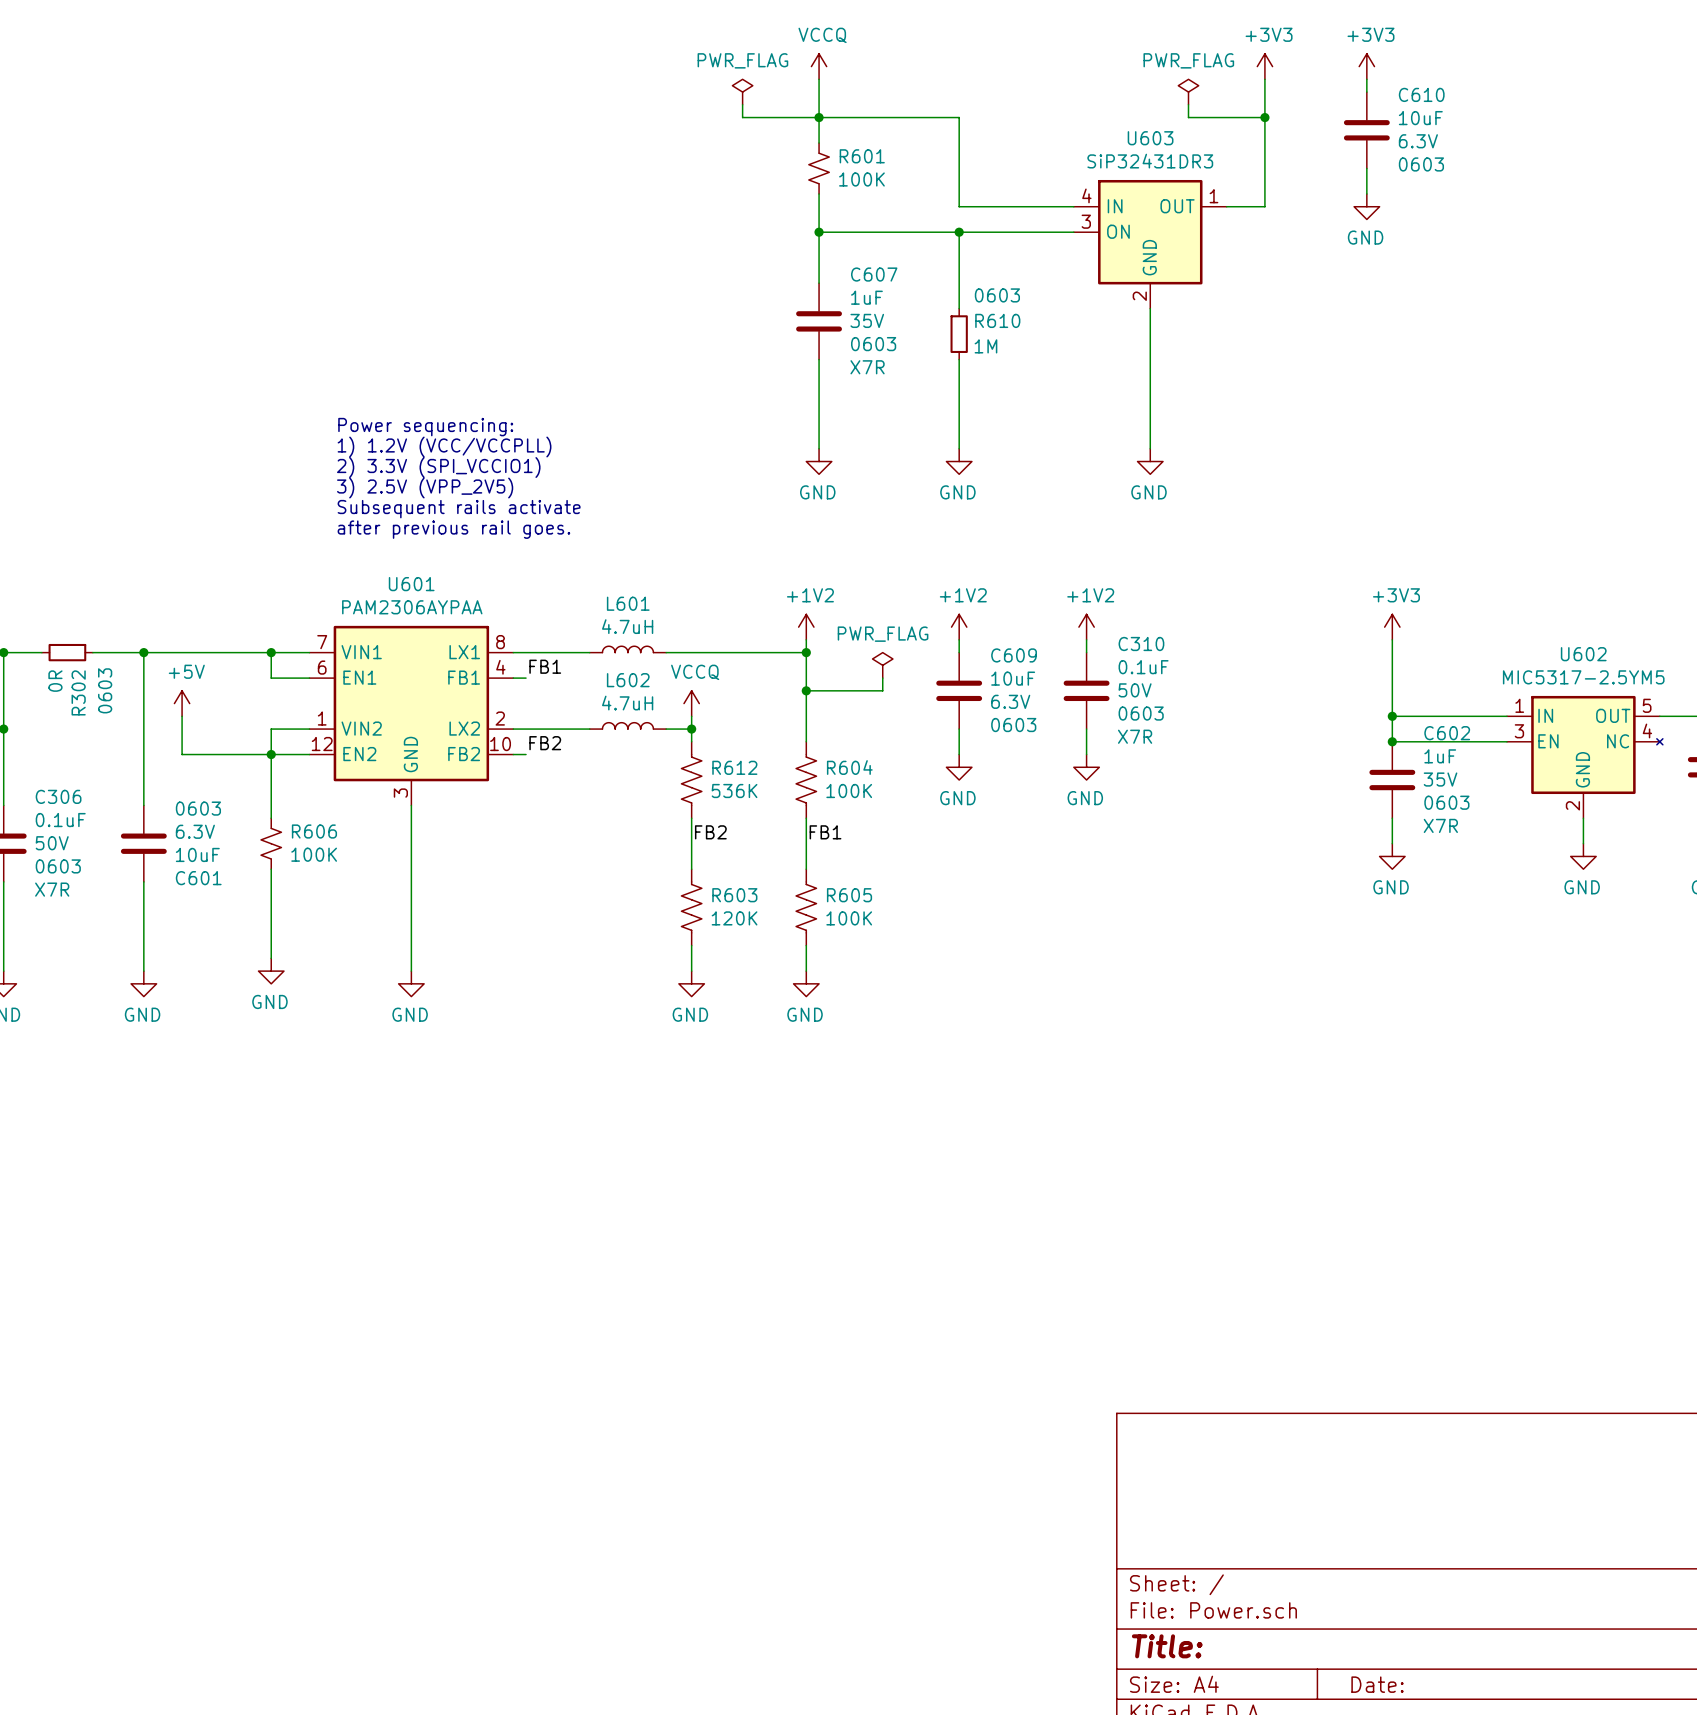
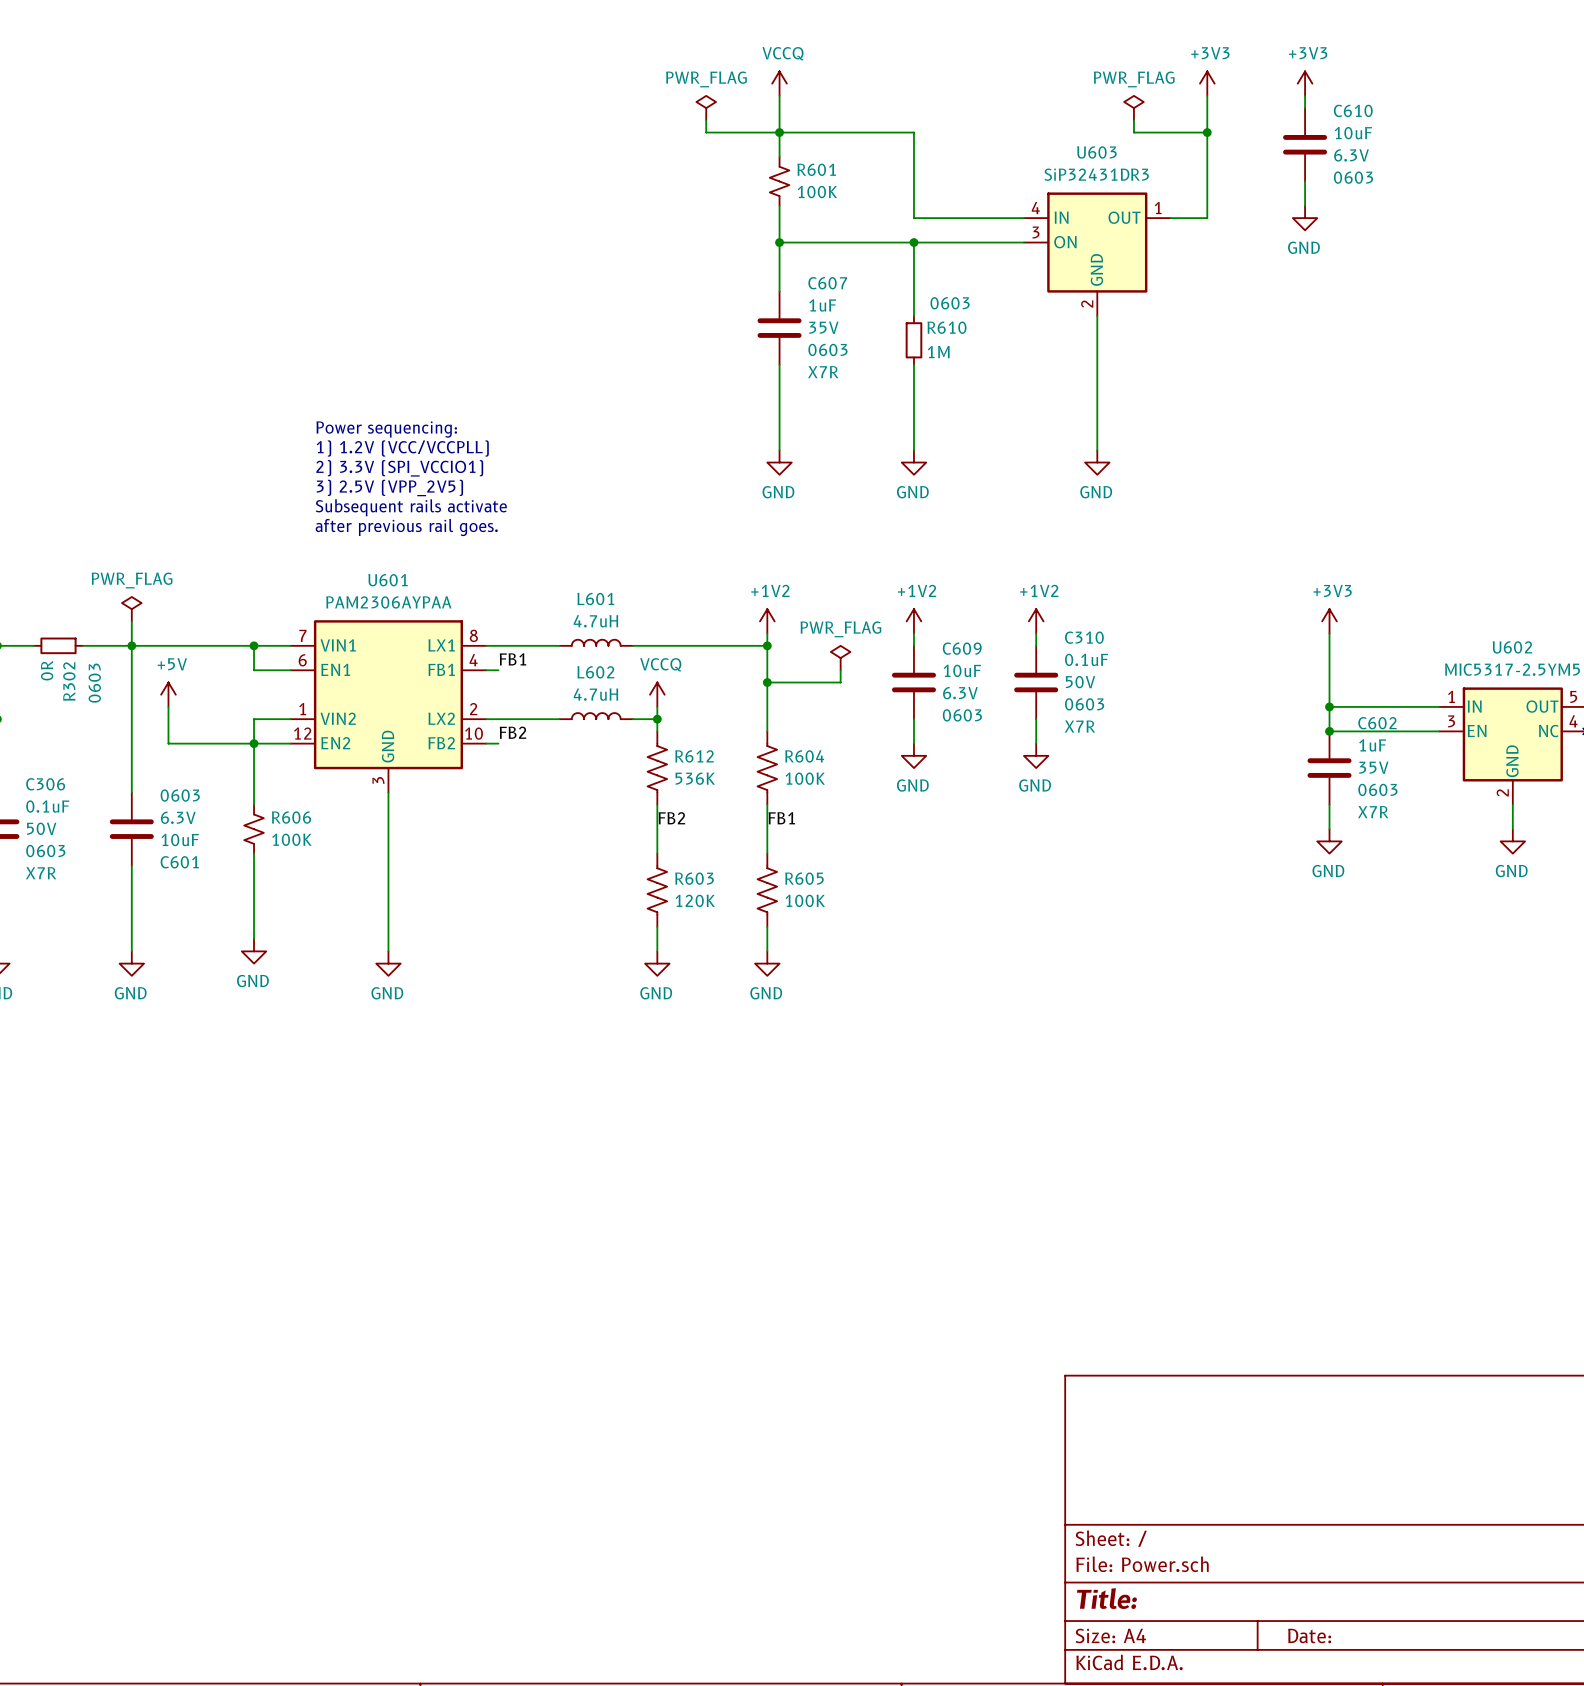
power symbol: none -> PWR_FLAG (131, 609)
wire: none -> (131, 621) (131, 645)

